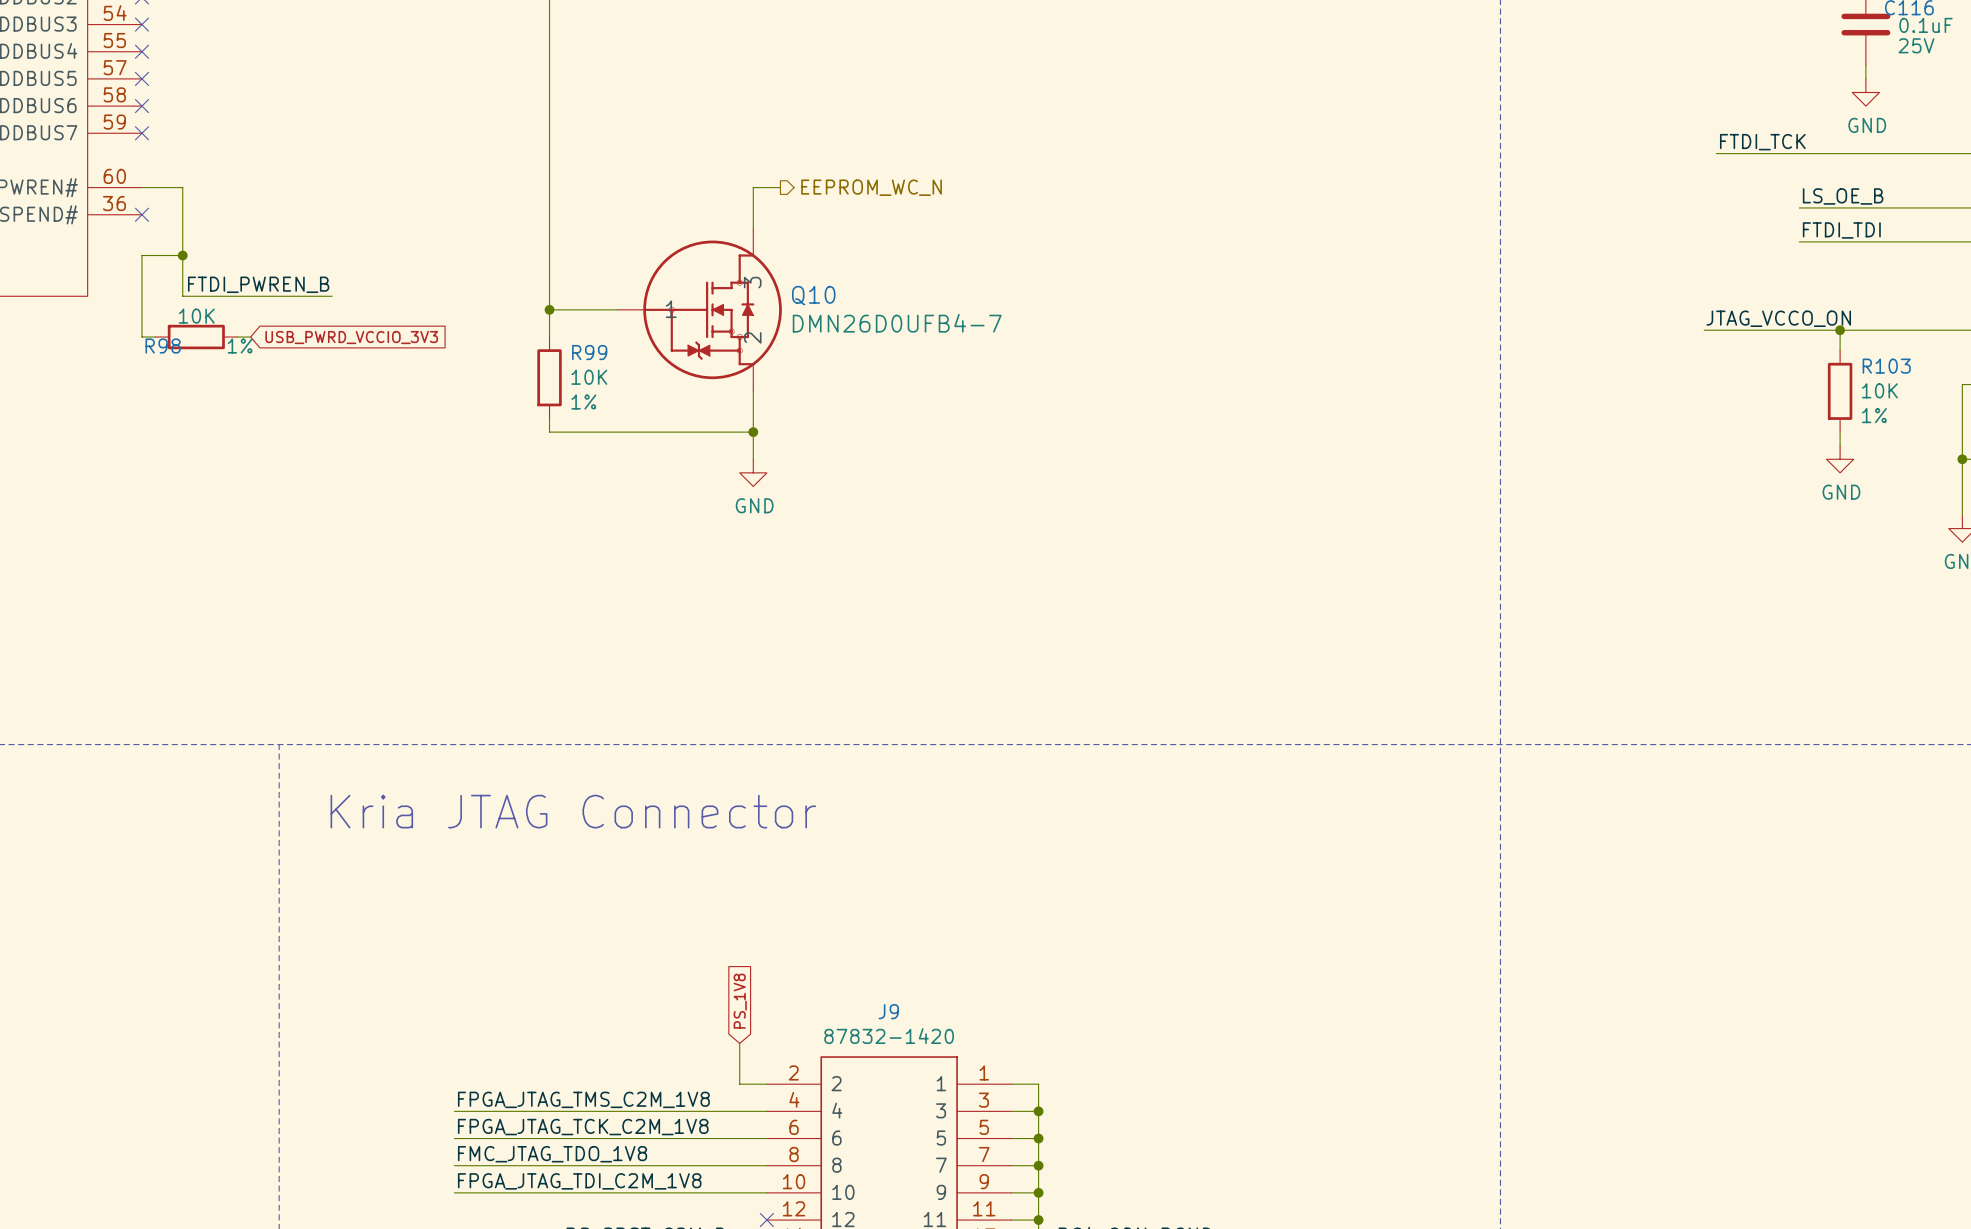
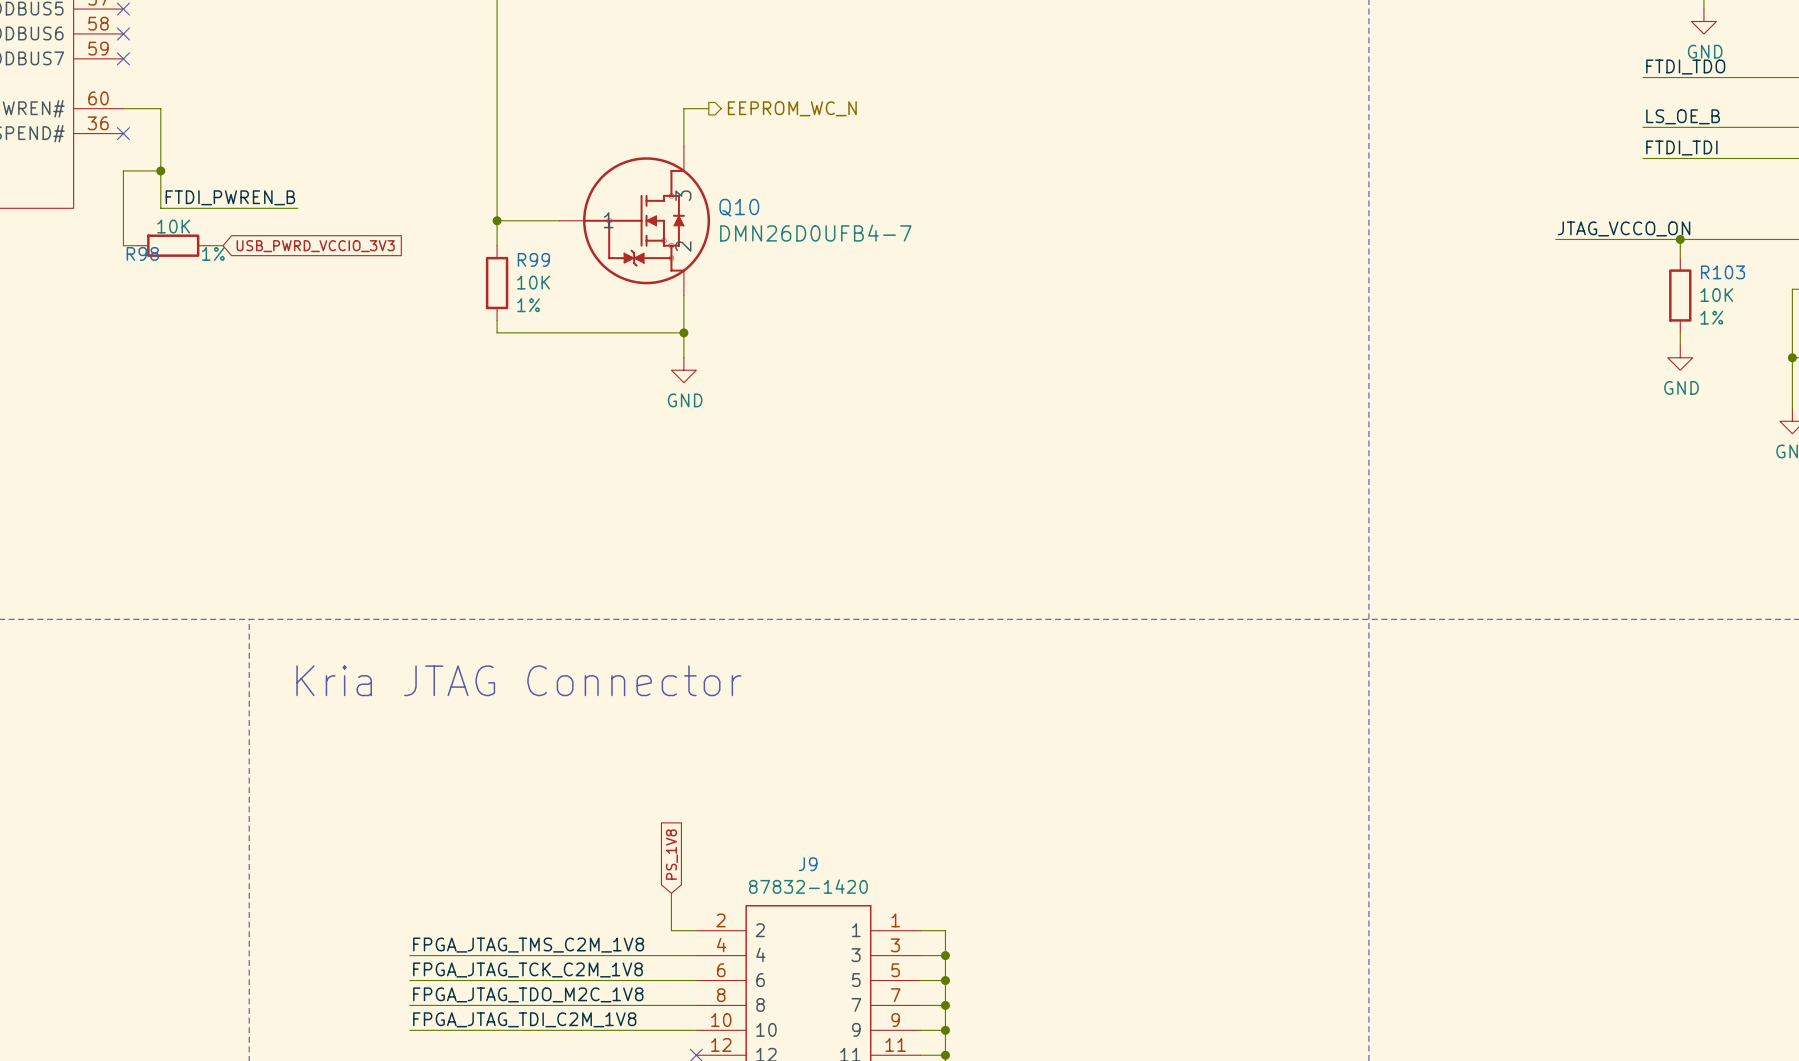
label: FTDI_TCK (1762, 142) -> FTDI_TDO (1685, 67)
wire: (1716, 153) (1799, 153) -> none
label: FMC_JTAG_TDO_1V8 (552, 1154) -> FPGA_JTAG_TDO_M2C_1V8 (528, 994)

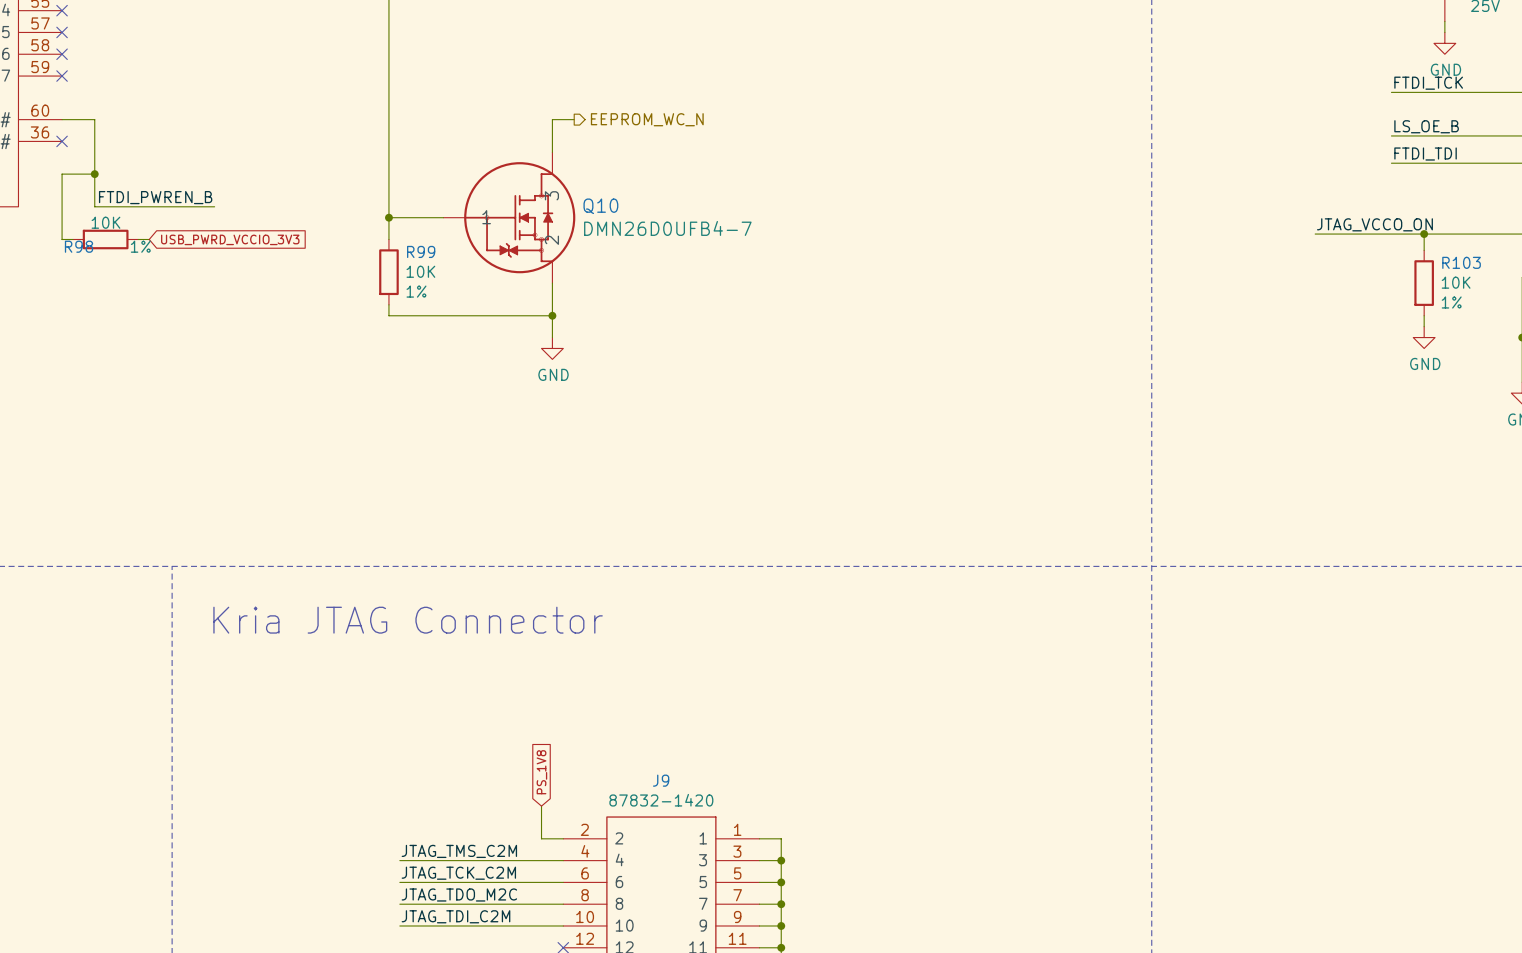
label: FTDI_TDO (1685, 67) -> FTDI_TCK (1428, 83)
label: FPGA_JTAG_TMS_C2M_1V8 (528, 945) -> none
label: none -> JTAG_TMS_C2M (459, 851)
wire: (409, 955) (509, 955) -> none
label: FPGA_JTAG_TCK_C2M_1V8 (528, 970) -> none
label: none -> JTAG_TCK_C2M (458, 873)
wire: (409, 980) (509, 980) -> none
label: FPGA_JTAG_TDO_M2C_1V8 (528, 994) -> JTAG_TDO_M2C (459, 894)
wire: (409, 1005) (509, 1005) -> none
label: FPGA_JTAG_TDI_C2M_1V8 (524, 1019) -> JTAG_TDI_C2M (455, 916)
wire: (409, 1030) (509, 1030) -> none

